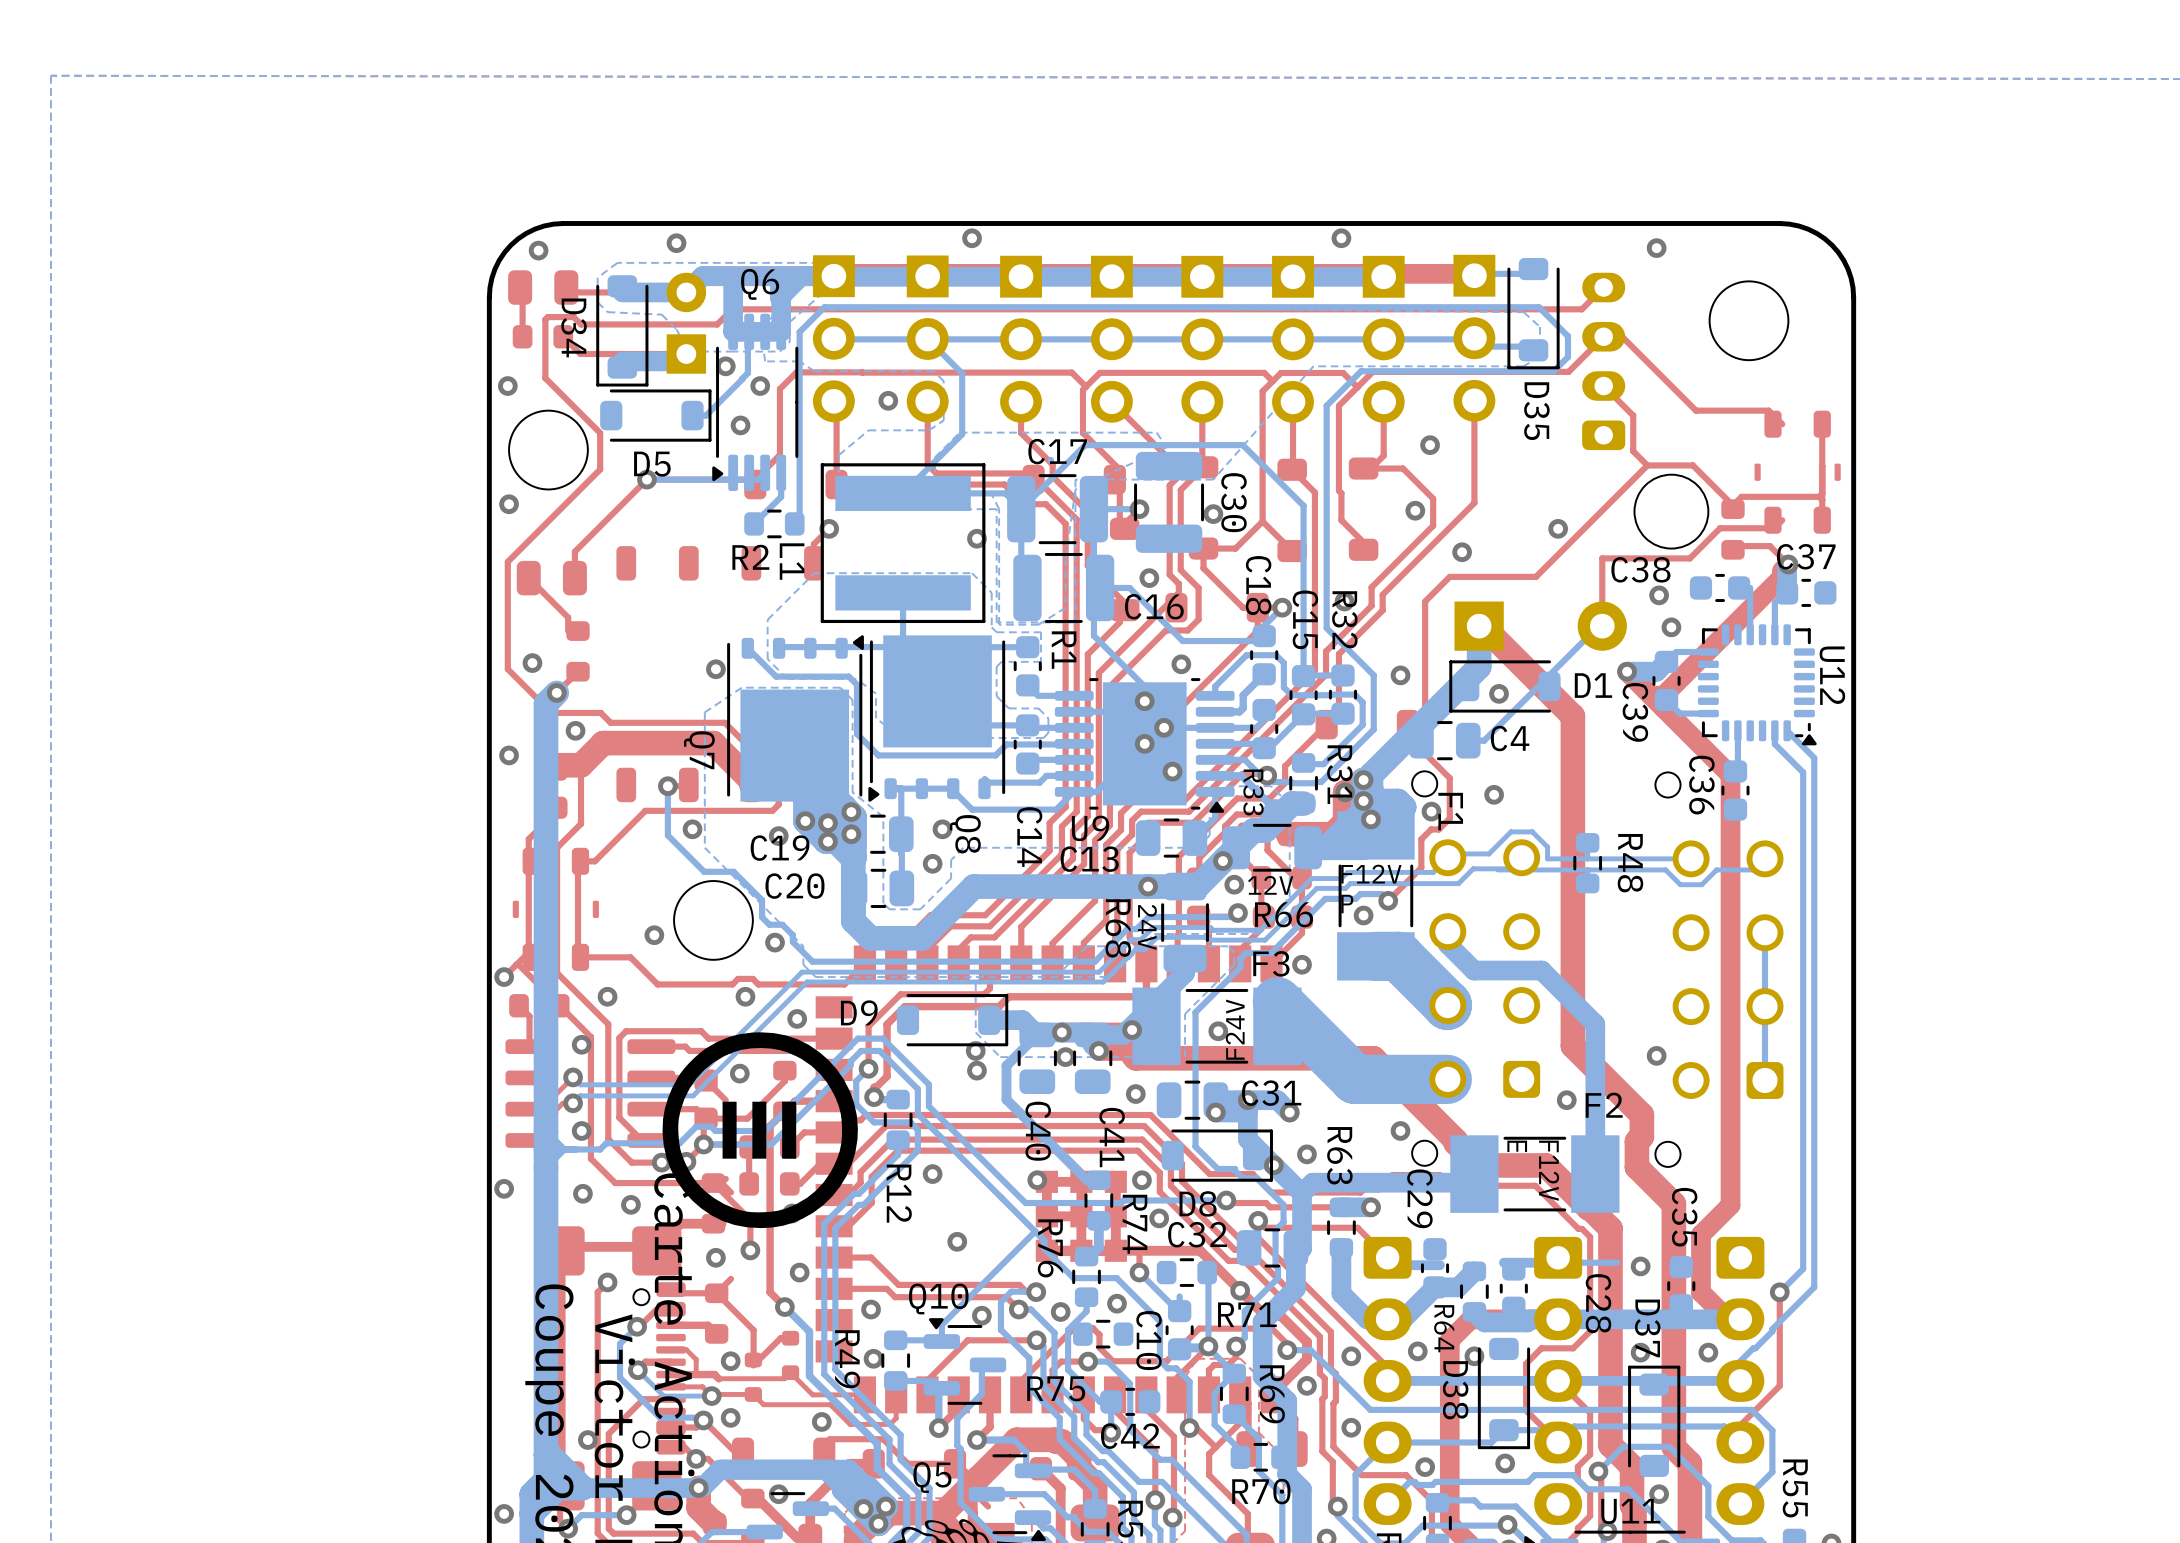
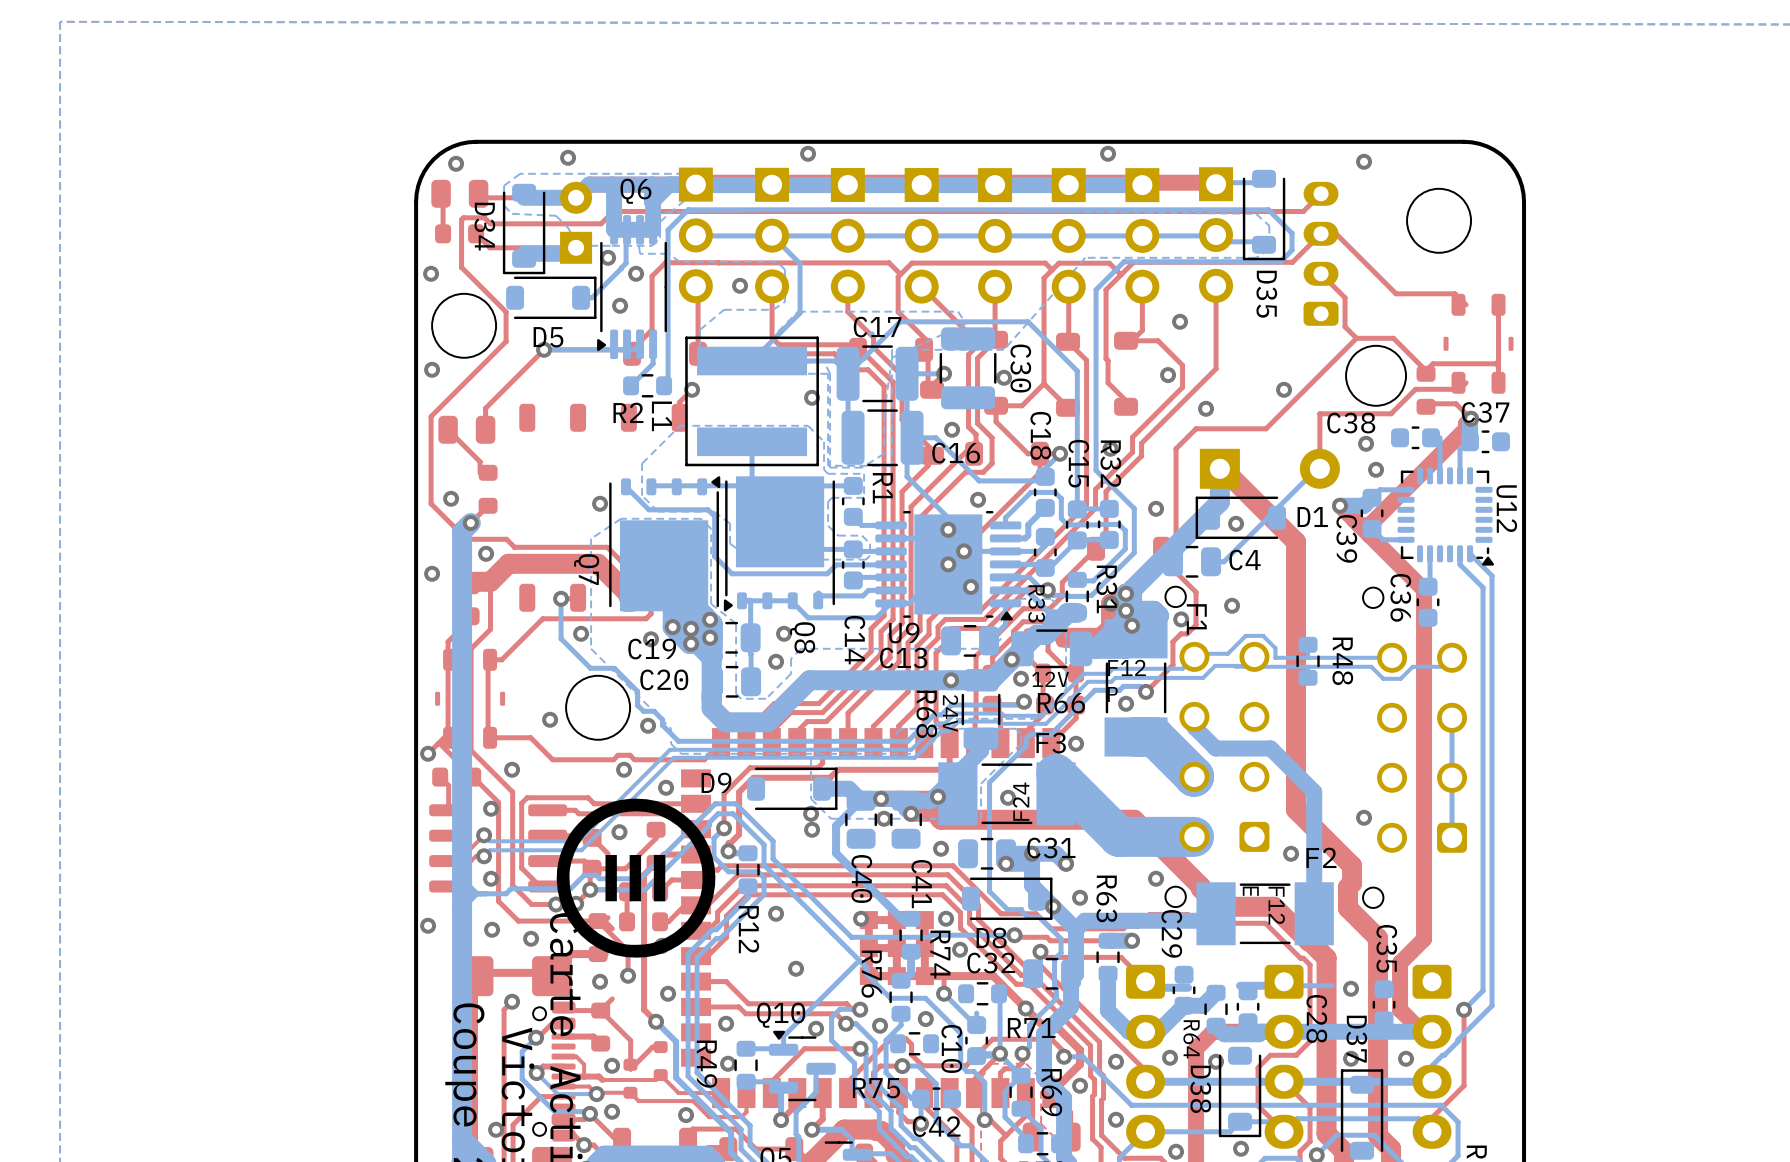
text: F12V (1371, 874) -> F12 (1126, 667)
text: F24V (1235, 1029) -> F24 (1021, 801)
text: F12V (1549, 1170) -> F12 (1276, 905)

